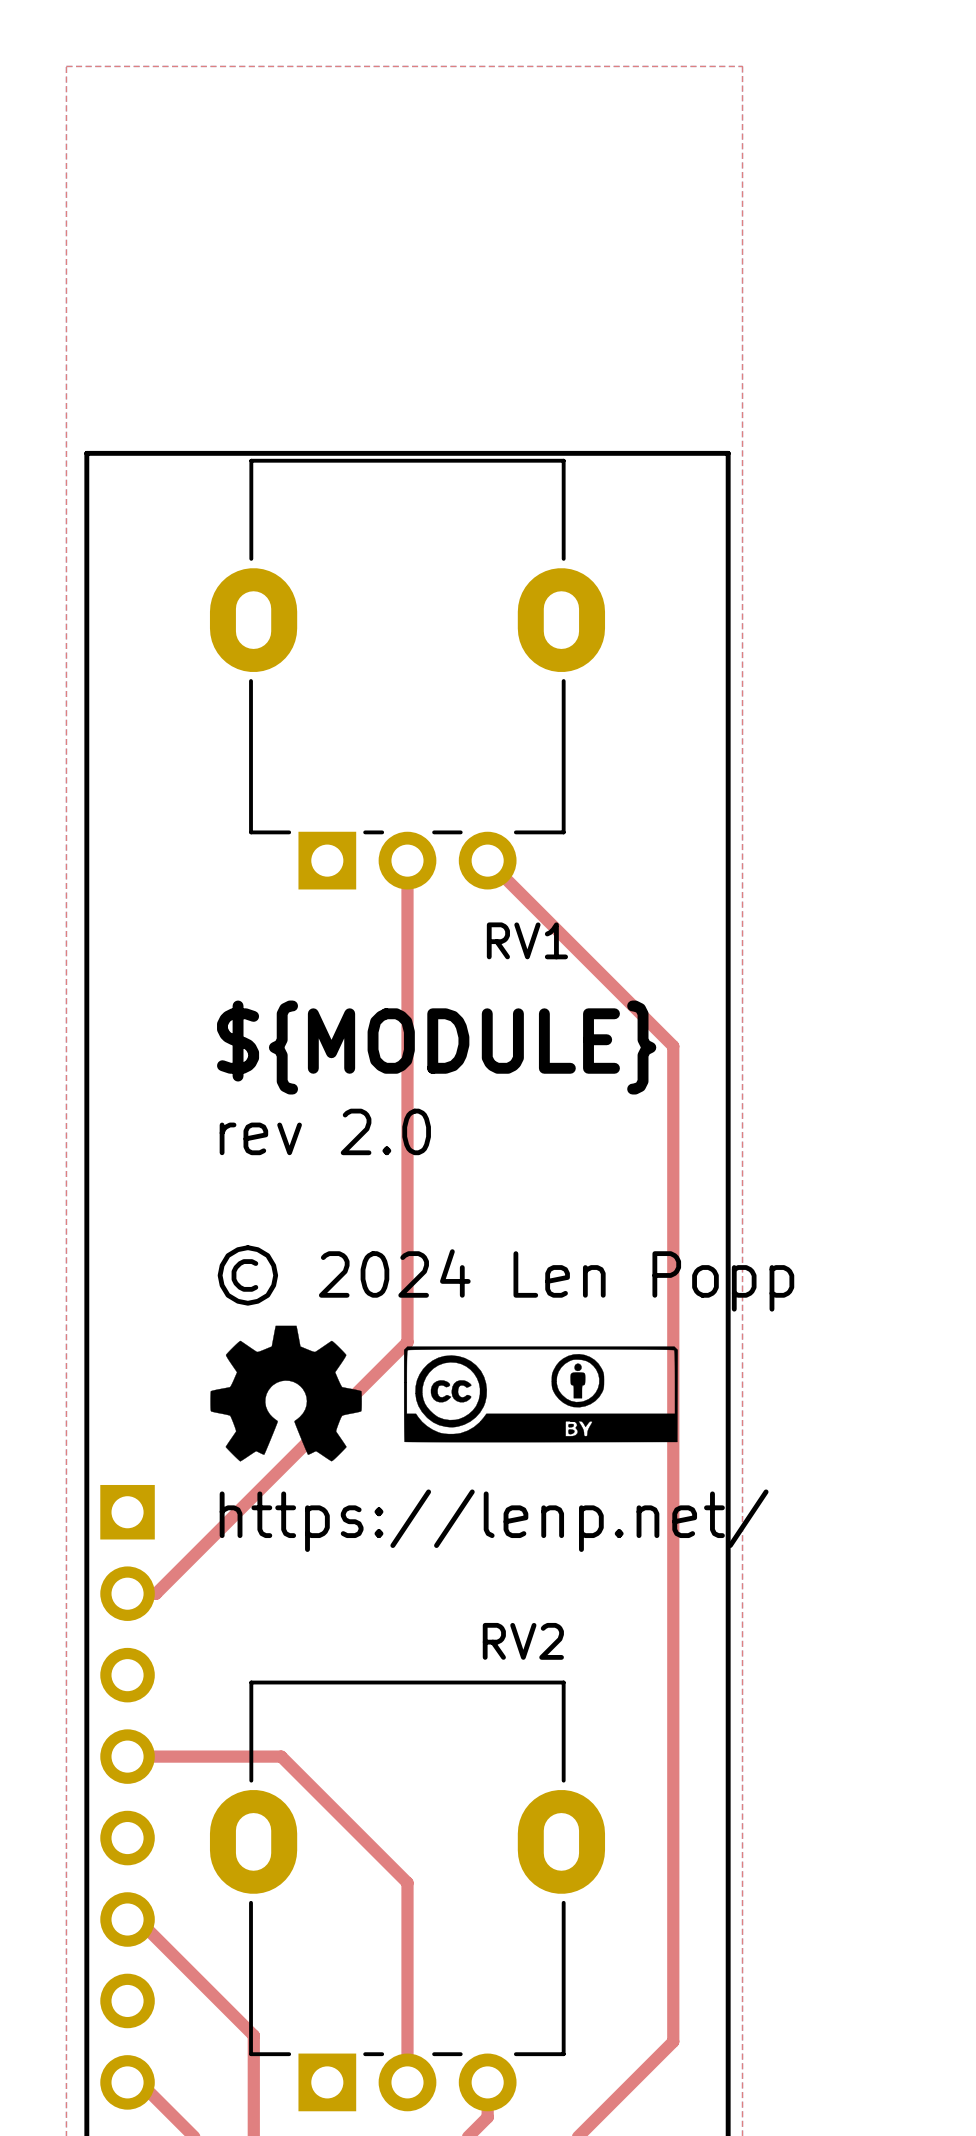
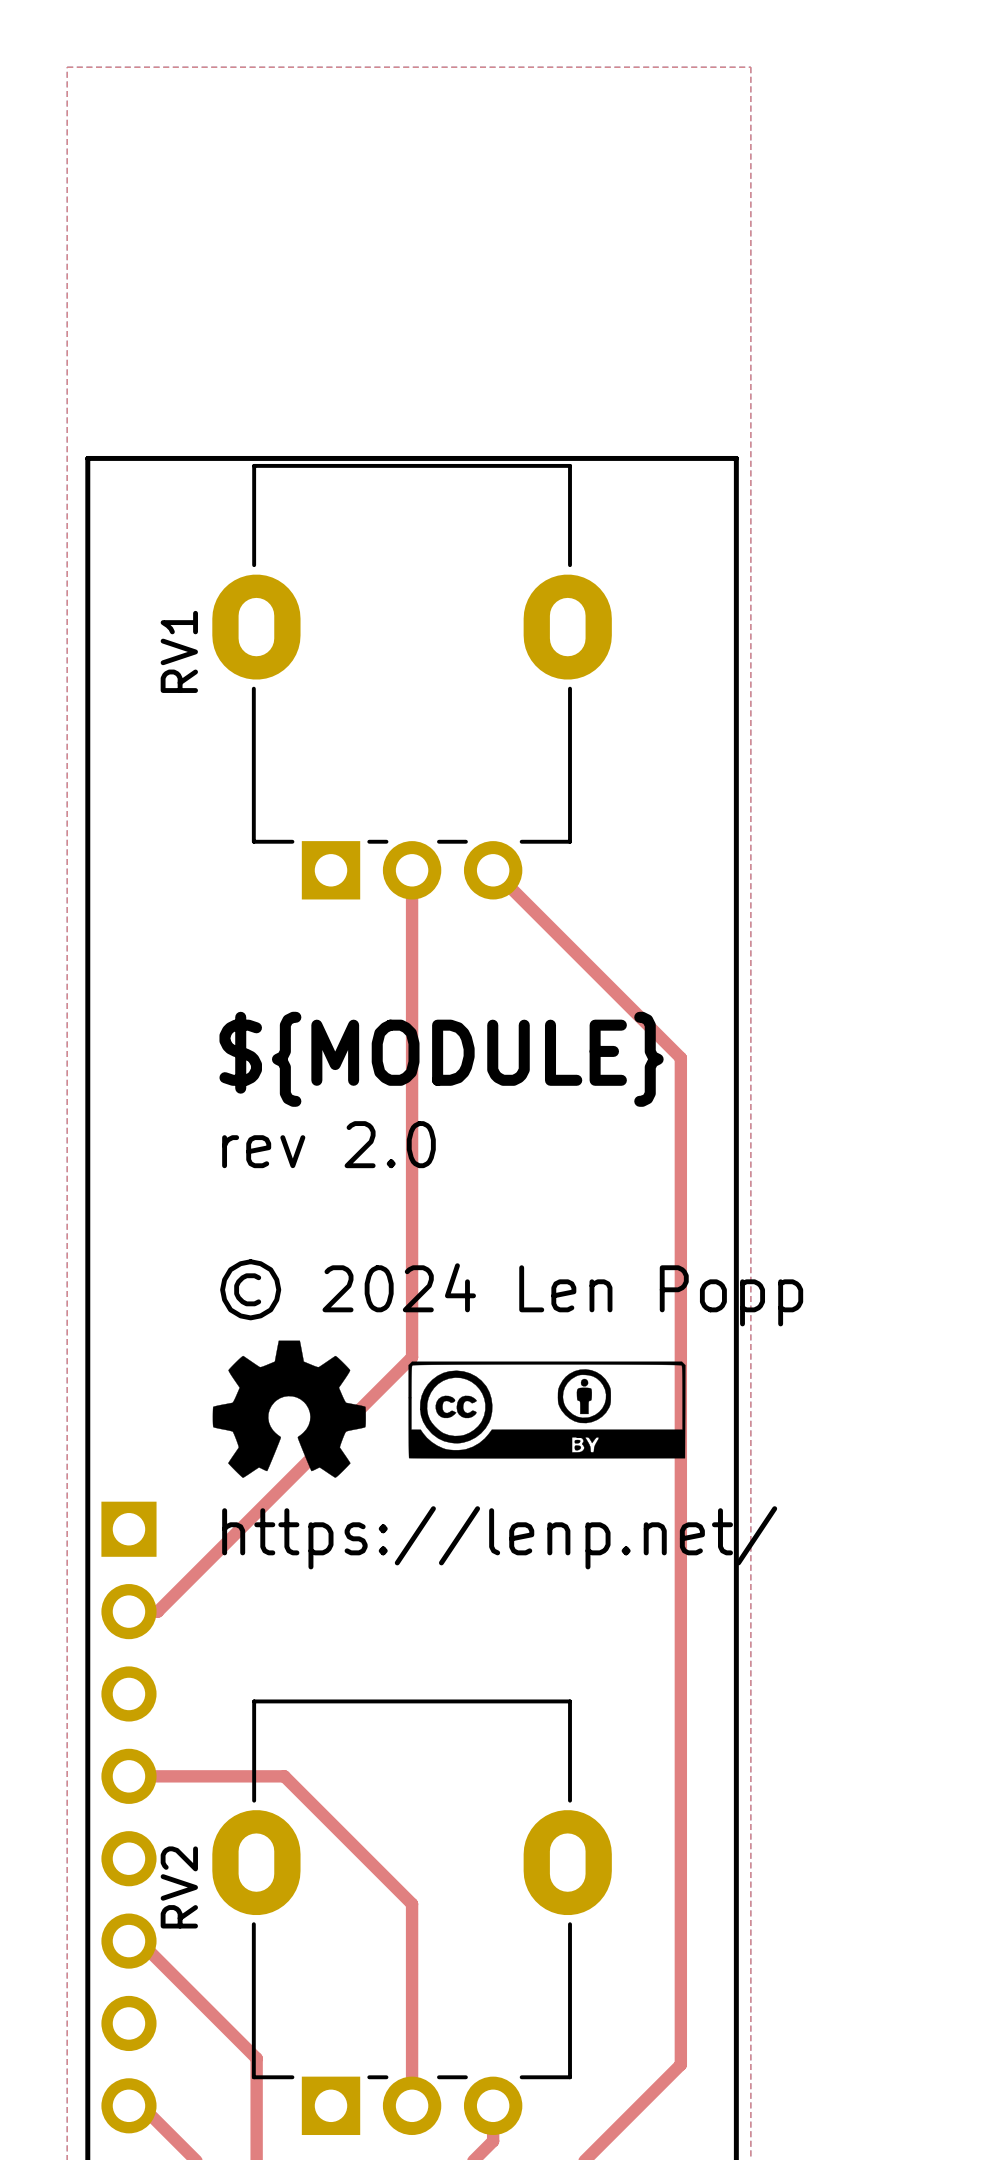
RV1 name rotation: 0° (527, 940) -> 90° counterclockwise (179, 651)
RV1 name position: RV1 (527, 940) -> RV1 (179, 651)
RV2 name rotation: 0° (523, 1641) -> 90° counterclockwise (179, 1887)
RV2 name position: RV2 (523, 1641) -> RV2 (179, 1887)

